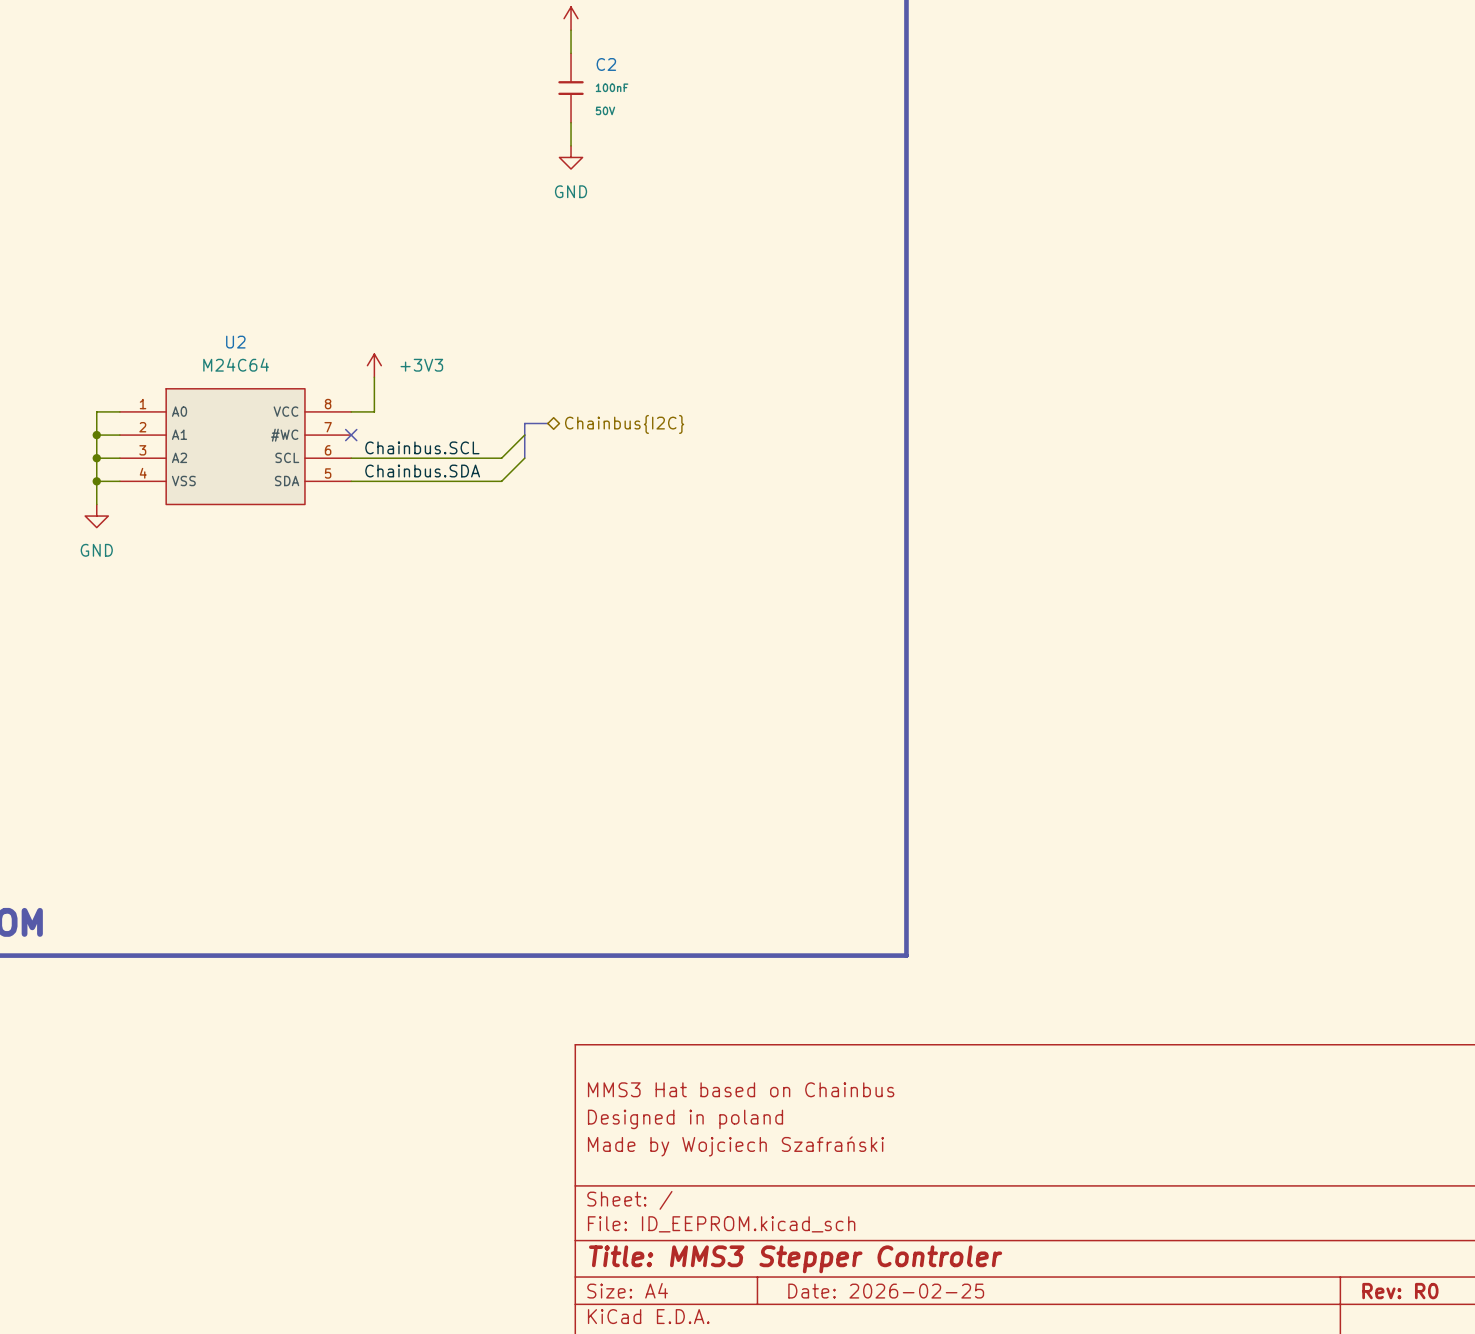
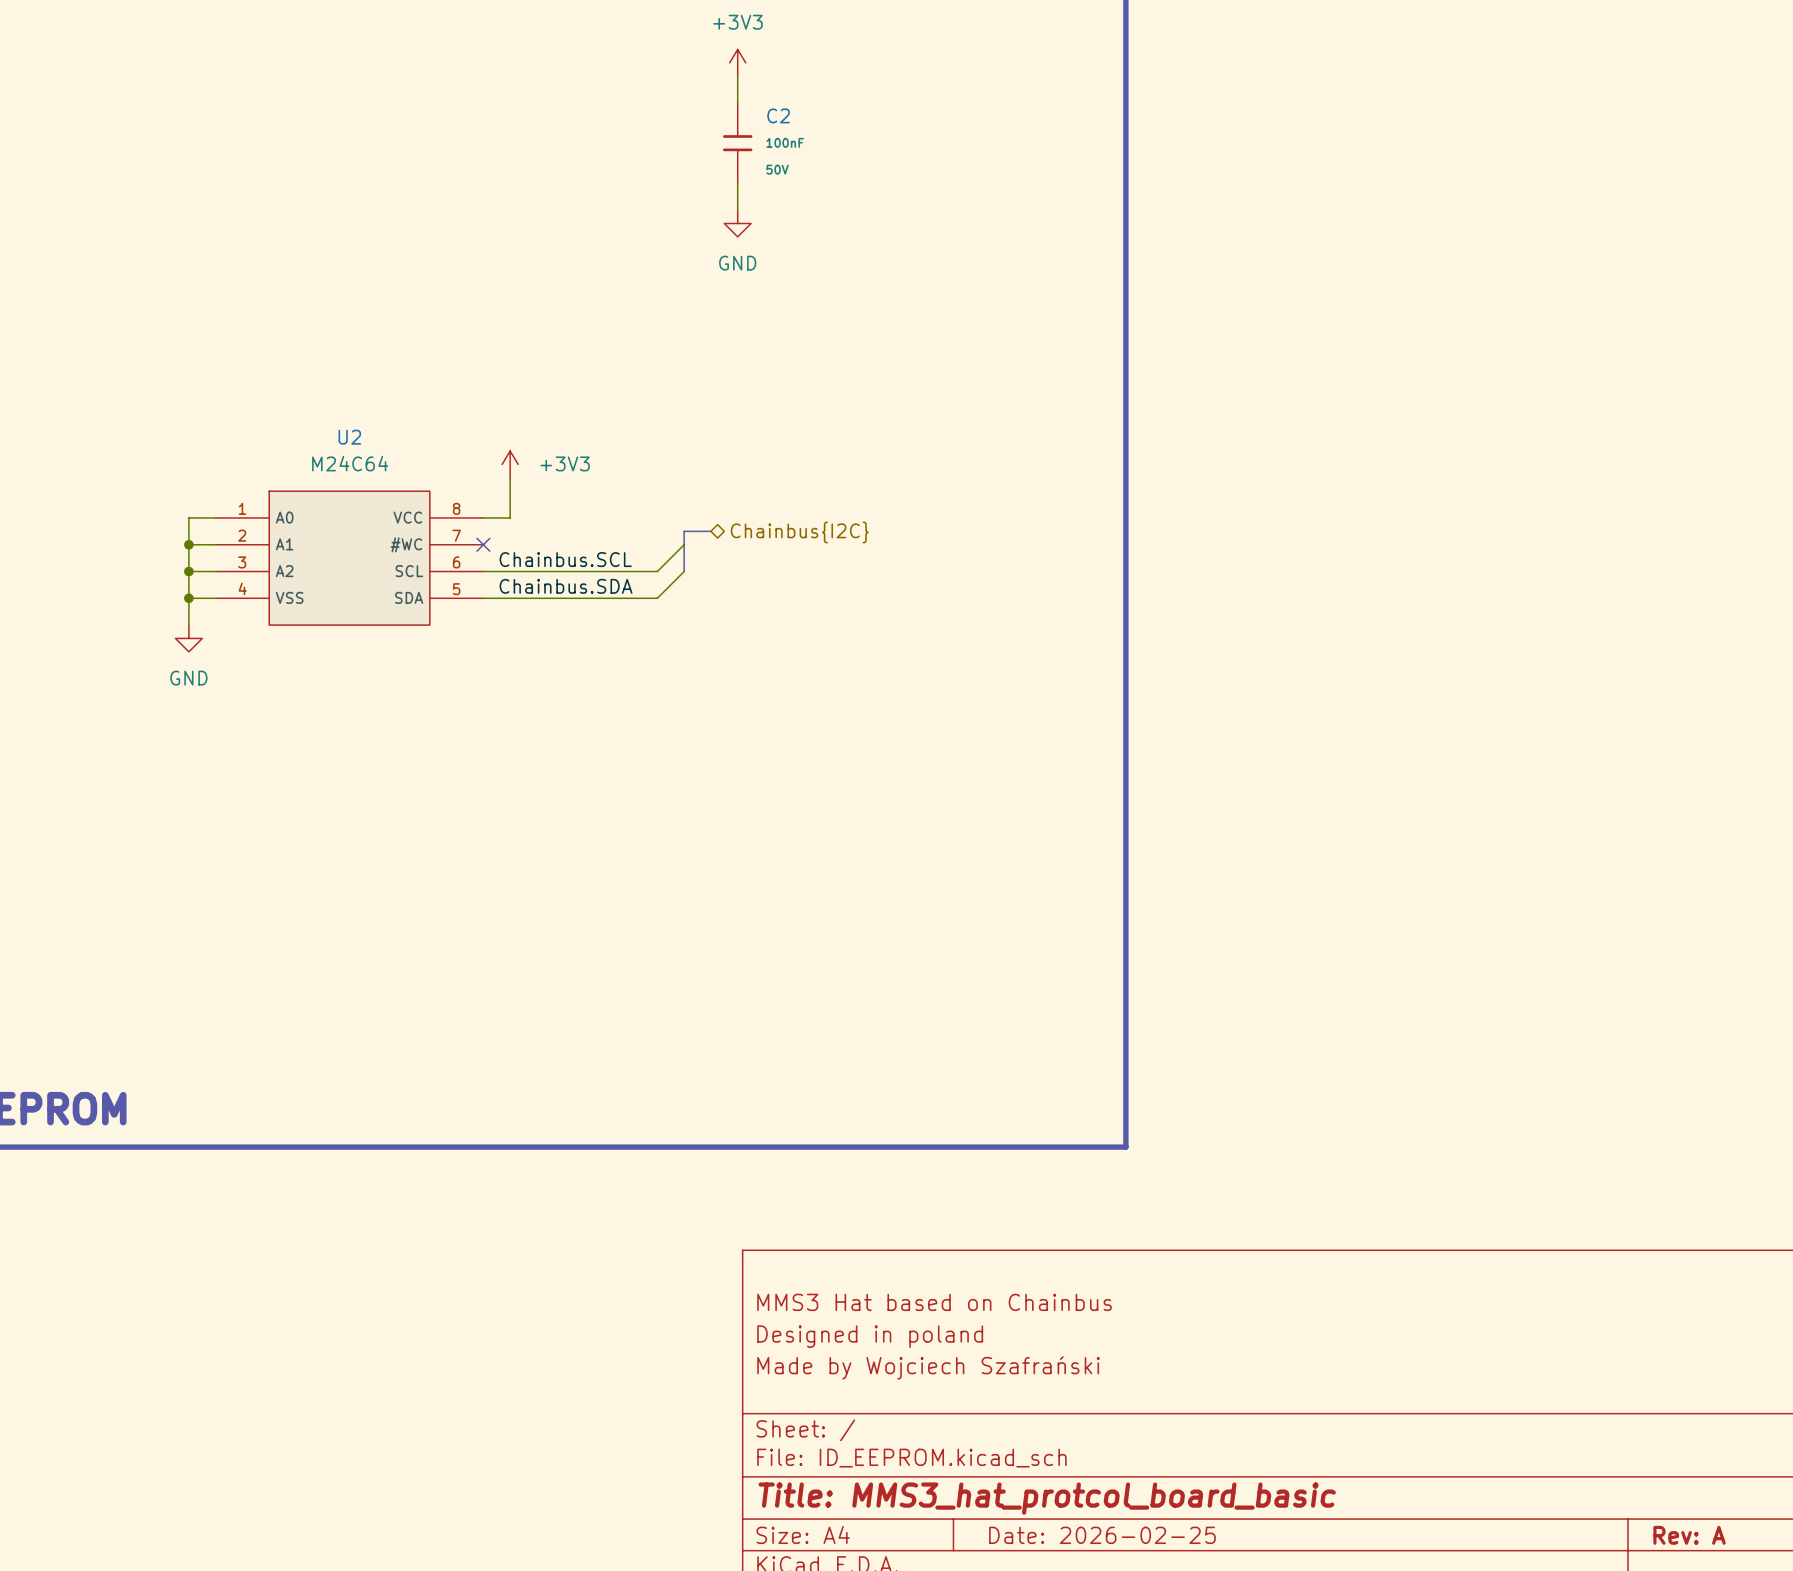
title block: Title: MMS3 Stepper Controler (795, 1259) -> Title: MMS3_hat_protcol_board_basic (1047, 1498)
title block: Rev: R0 (1400, 1291) -> Rev: A (1689, 1535)

